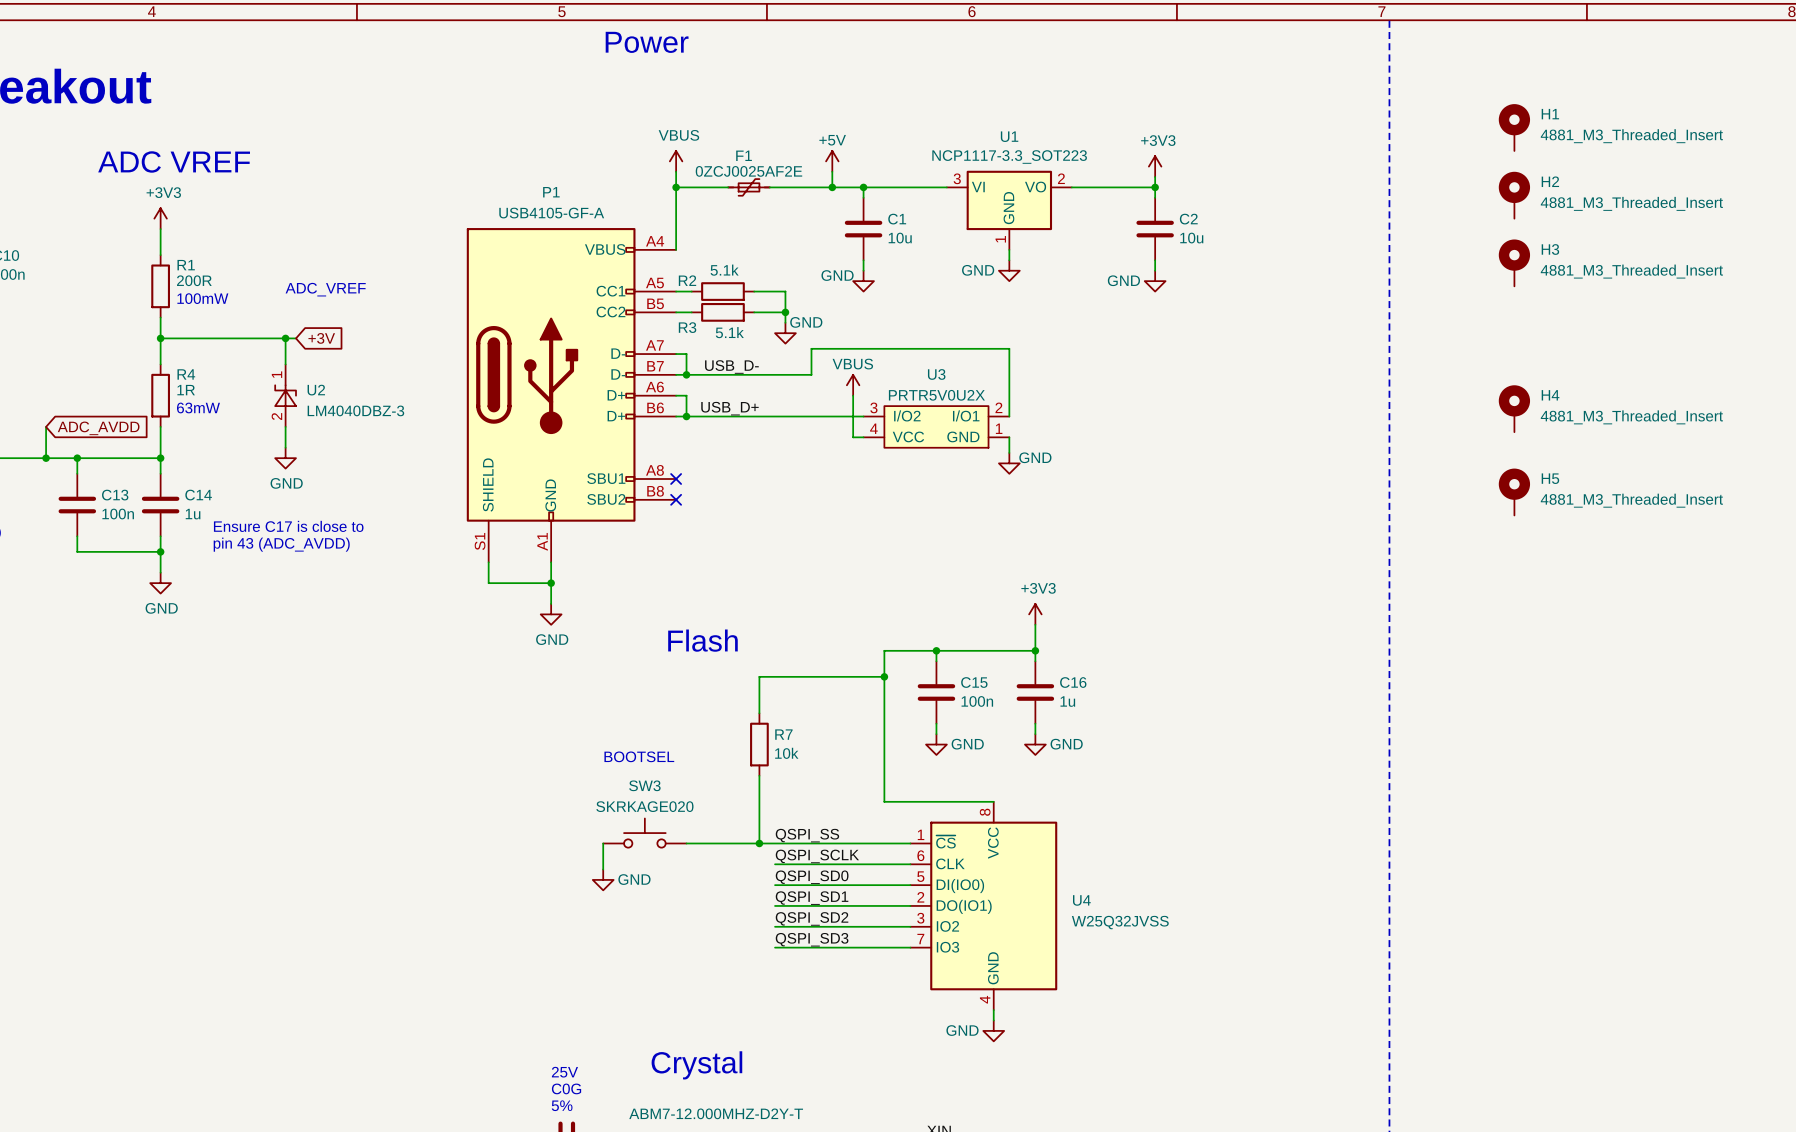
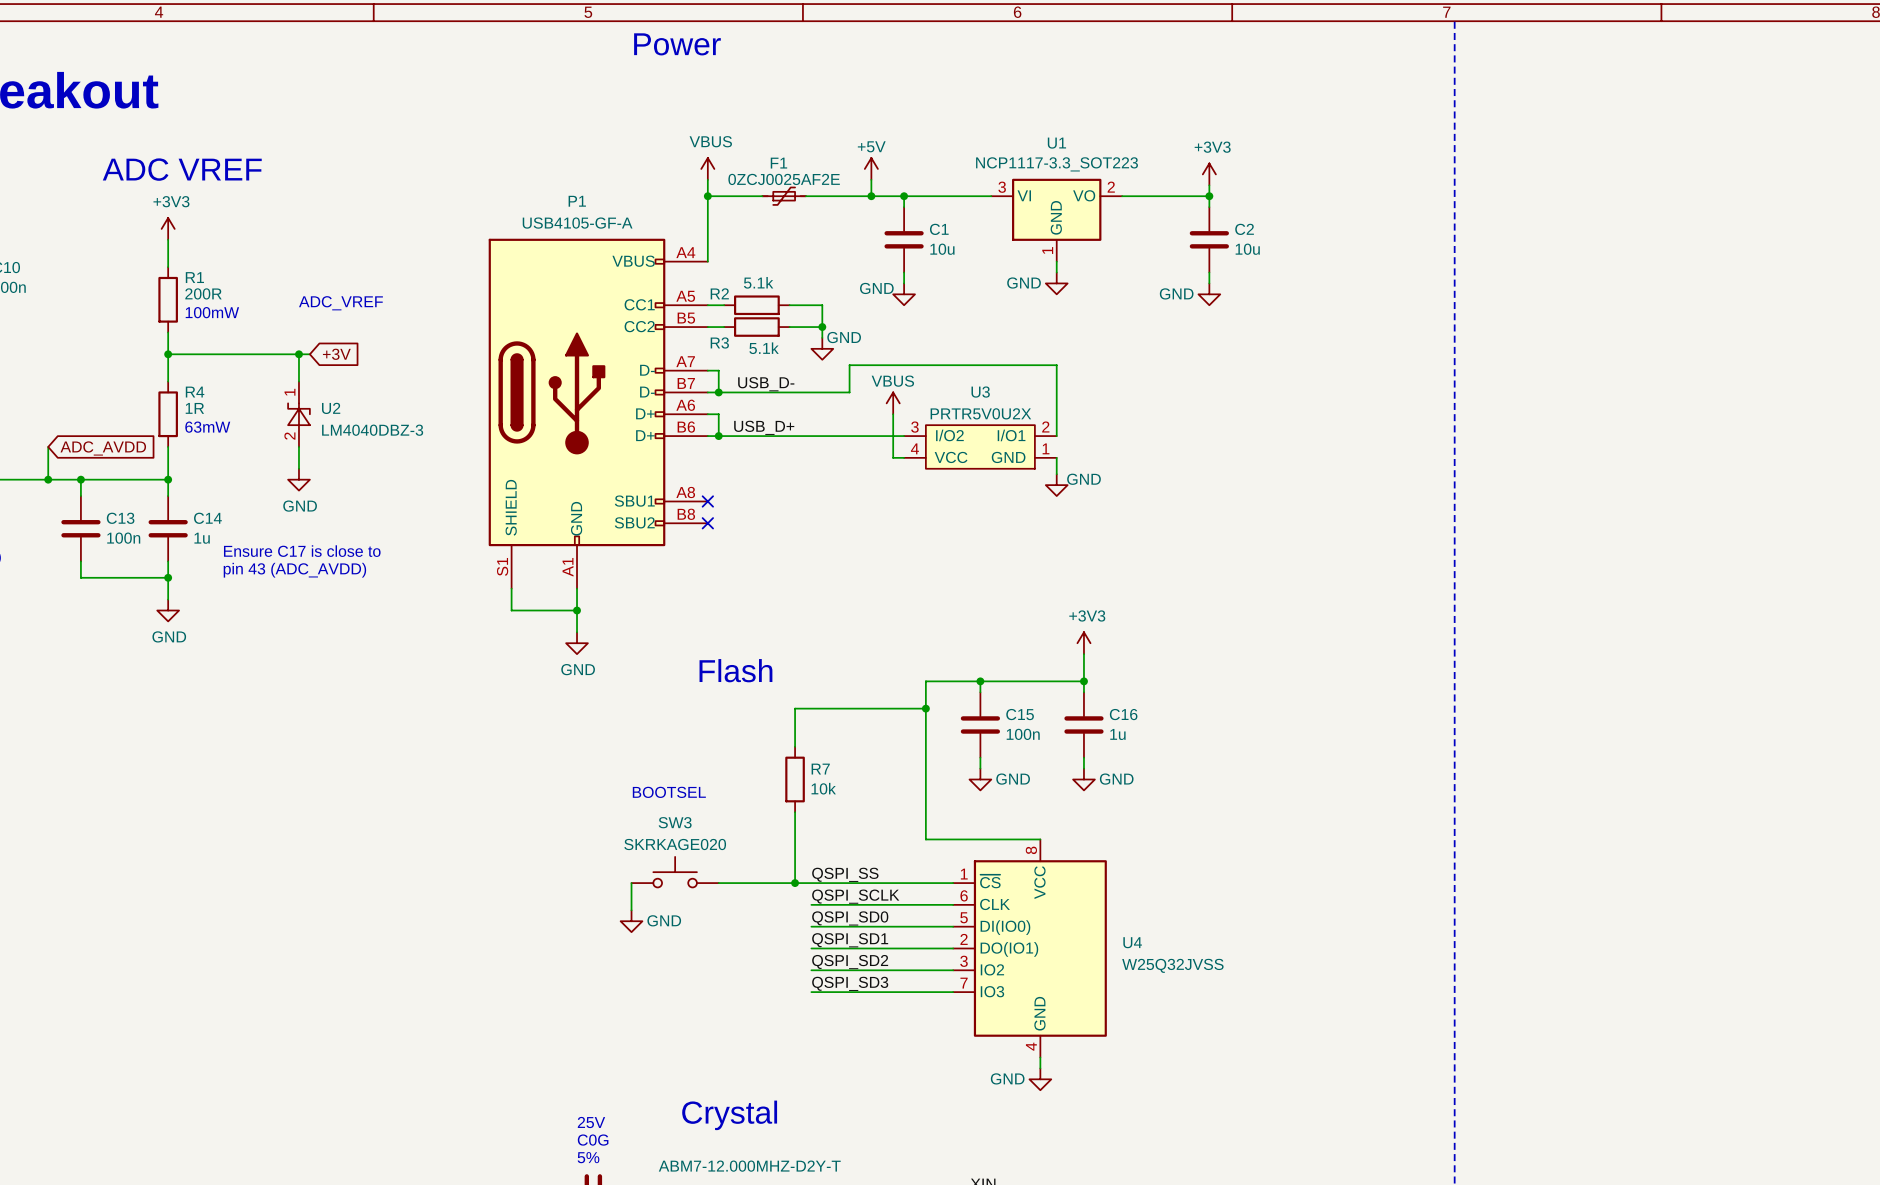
H1: 4881_M3_Threaded_Insert (1514, 127) -> none
H2: 4881_M3_Threaded_Insert (1514, 195) -> none
H3: 4881_M3_Threaded_Insert (1514, 262) -> none
H4: 4881_M3_Threaded_Insert (1514, 408) -> none
H5: 4881_M3_Threaded_Insert (1514, 492) -> none

